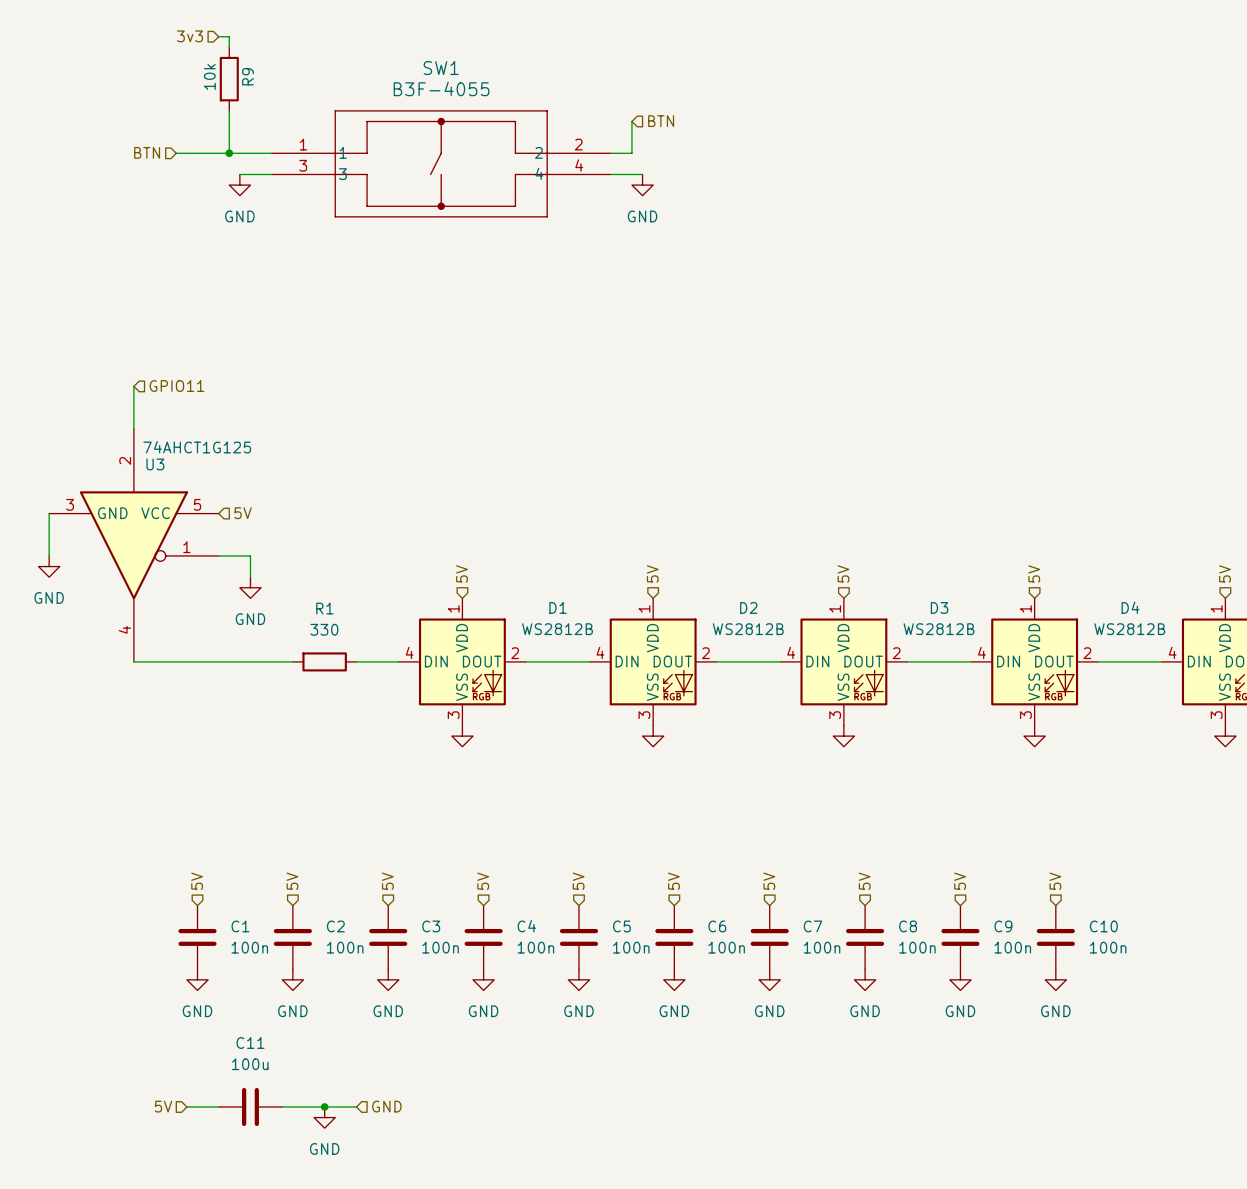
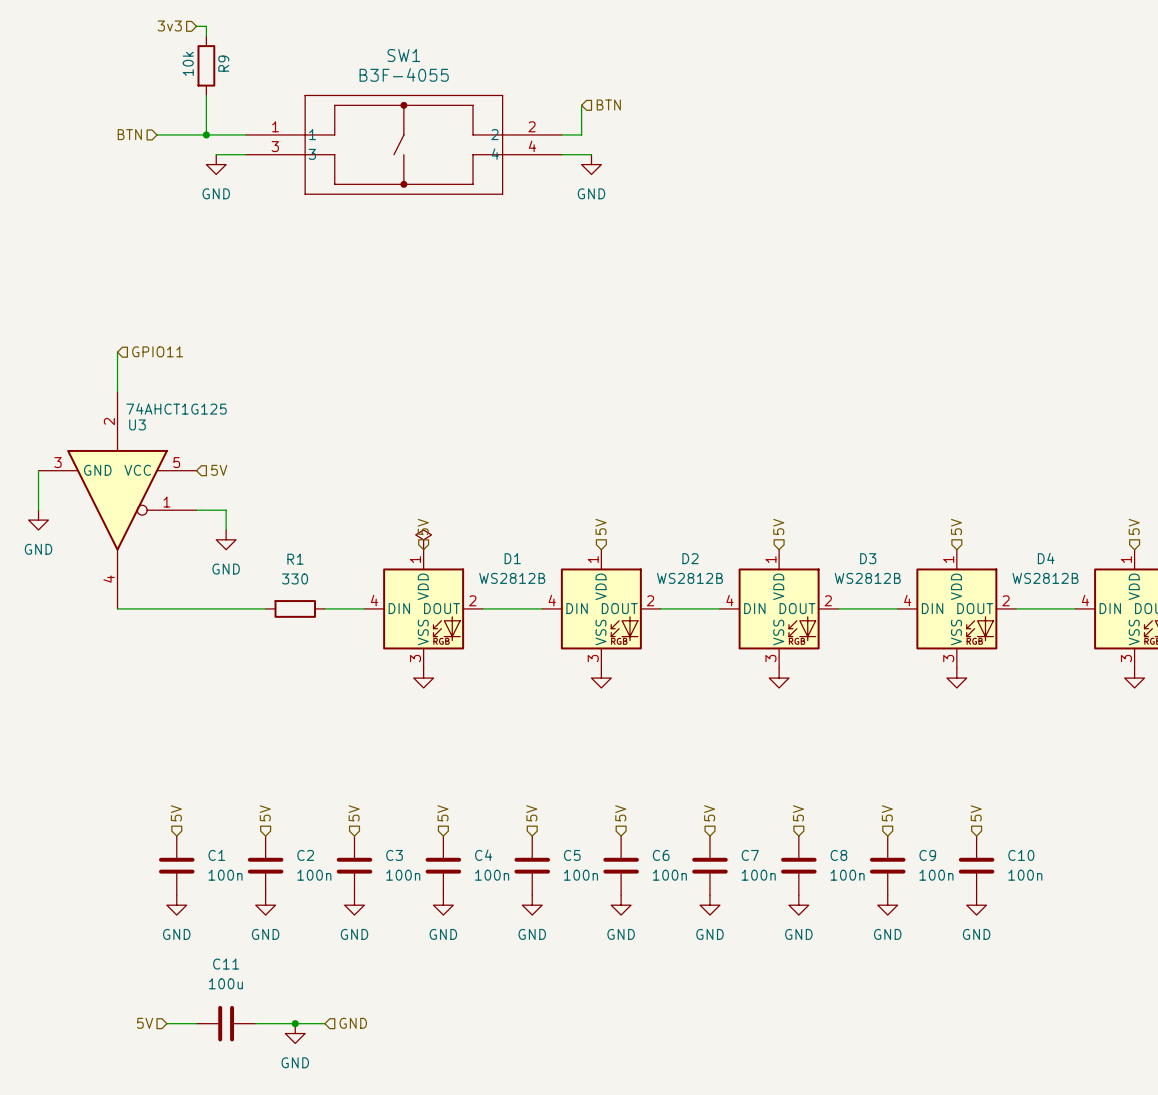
power symbol: none -> (423, 539)

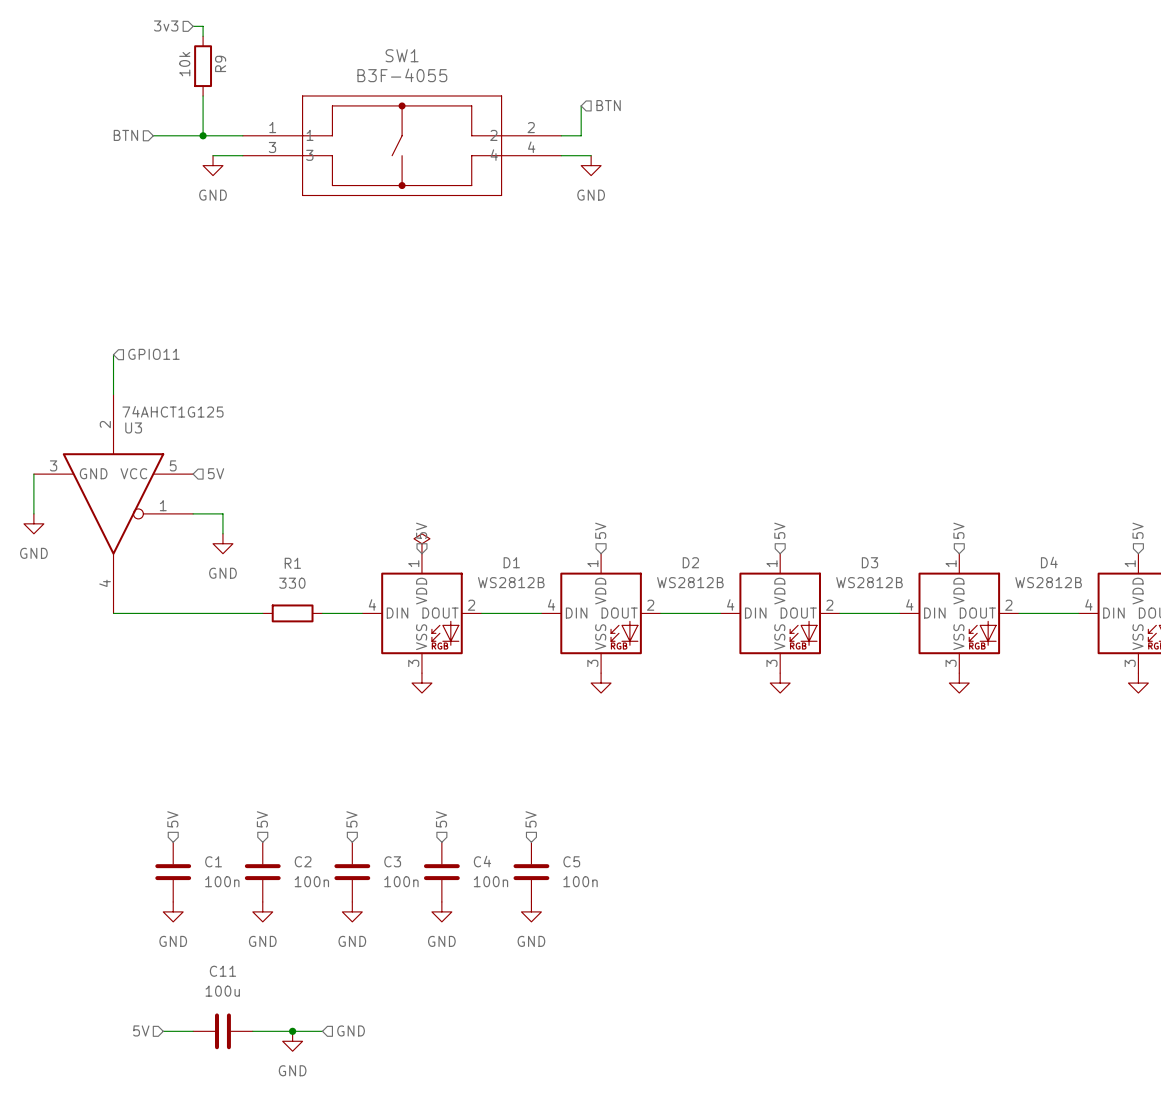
hierarchical label: 5V (620, 813) -> none
hierarchical label: 5V (709, 813) -> none
hierarchical label: 5V (798, 813) -> none
hierarchical label: 5V (887, 813) -> none
hierarchical label: 5V (976, 813) -> none
C6: 100n (621, 865) -> none
C7: 100n (709, 865) -> none
C8: 100n (798, 865) -> none
C9: 100n (887, 865) -> none
C10: 100n (976, 865) -> none
power symbol: GND (621, 905) -> none
power symbol: GND (709, 905) -> none
power symbol: GND (798, 905) -> none
power symbol: GND (887, 905) -> none
power symbol: GND (976, 905) -> none

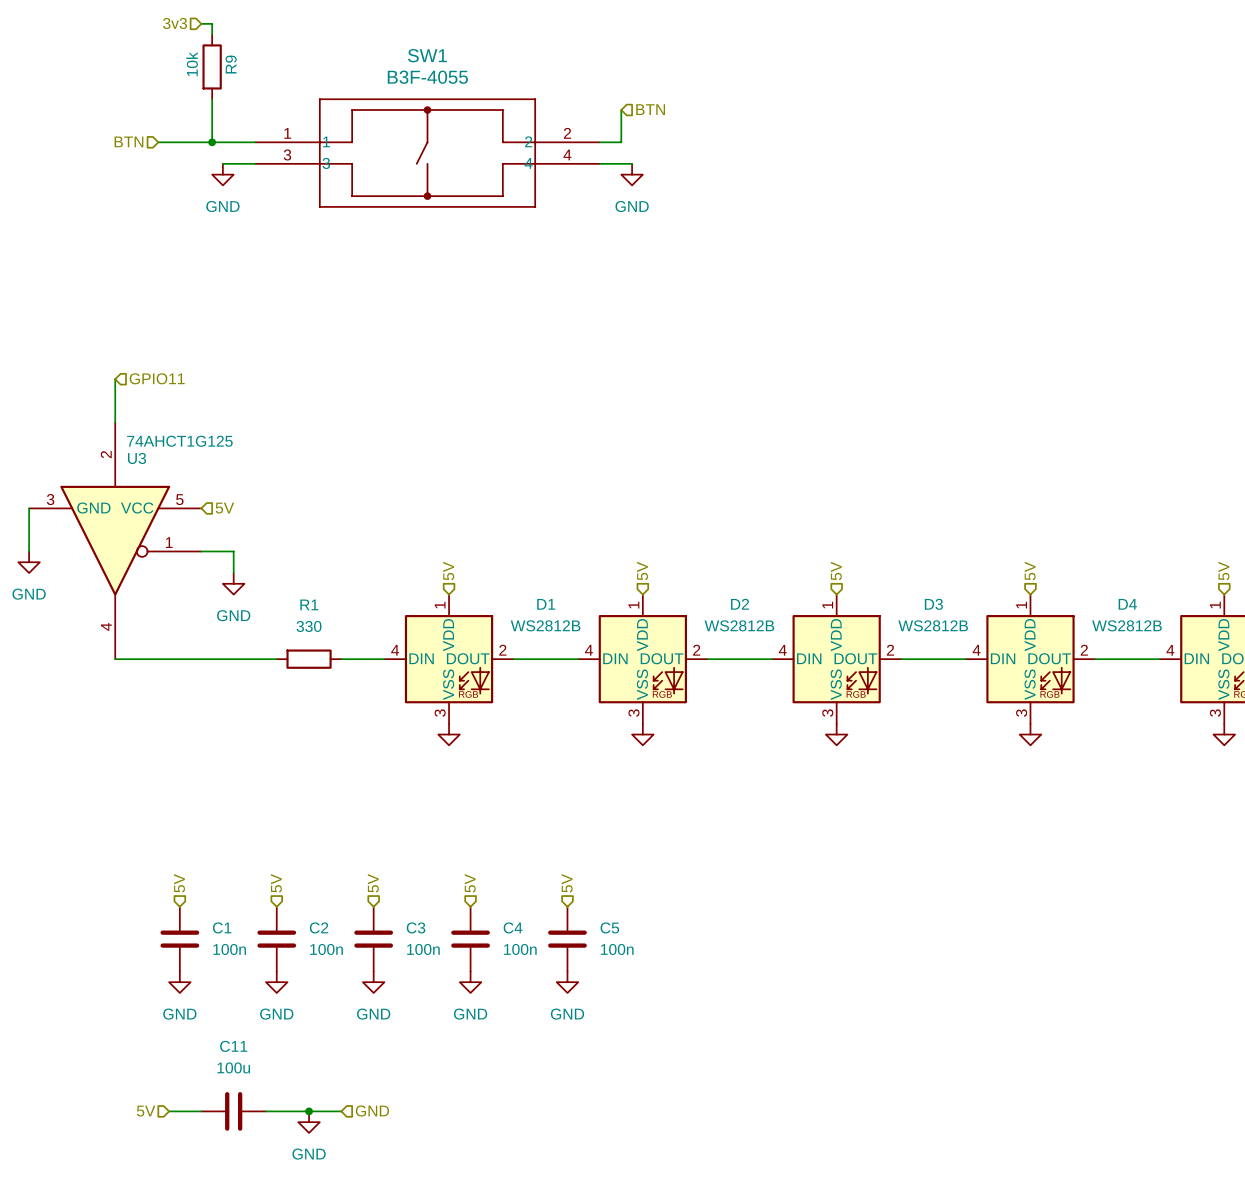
power symbol: (421, 543) -> none

